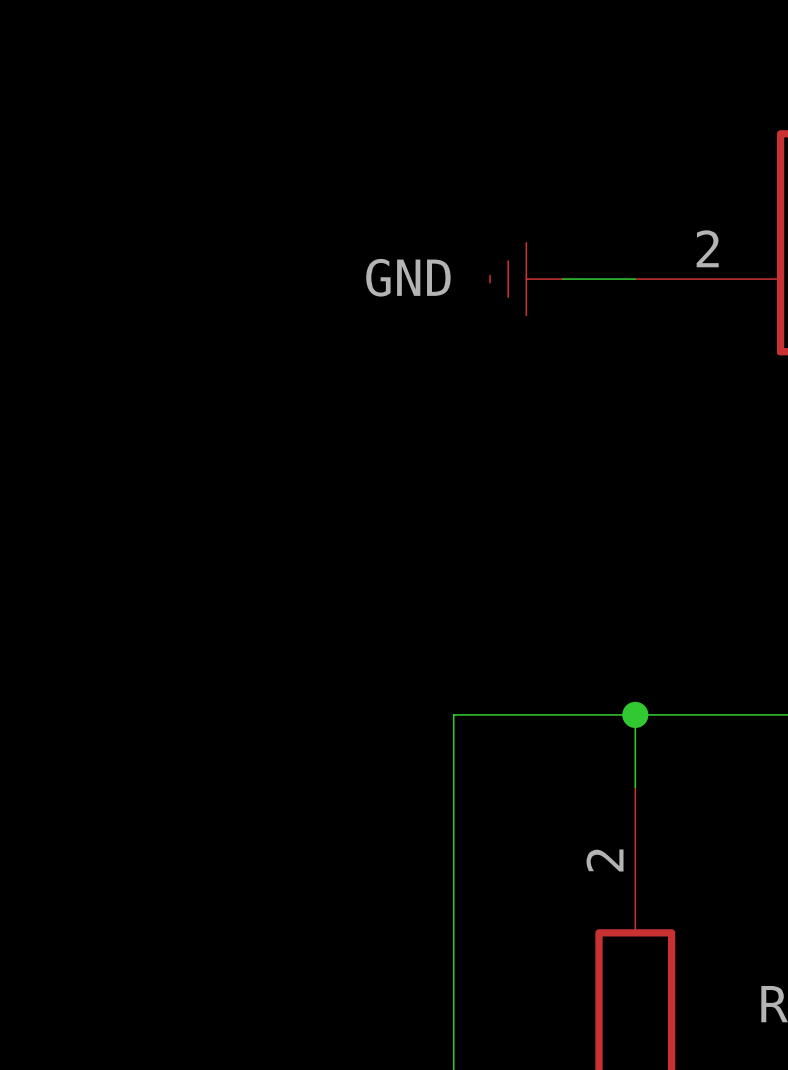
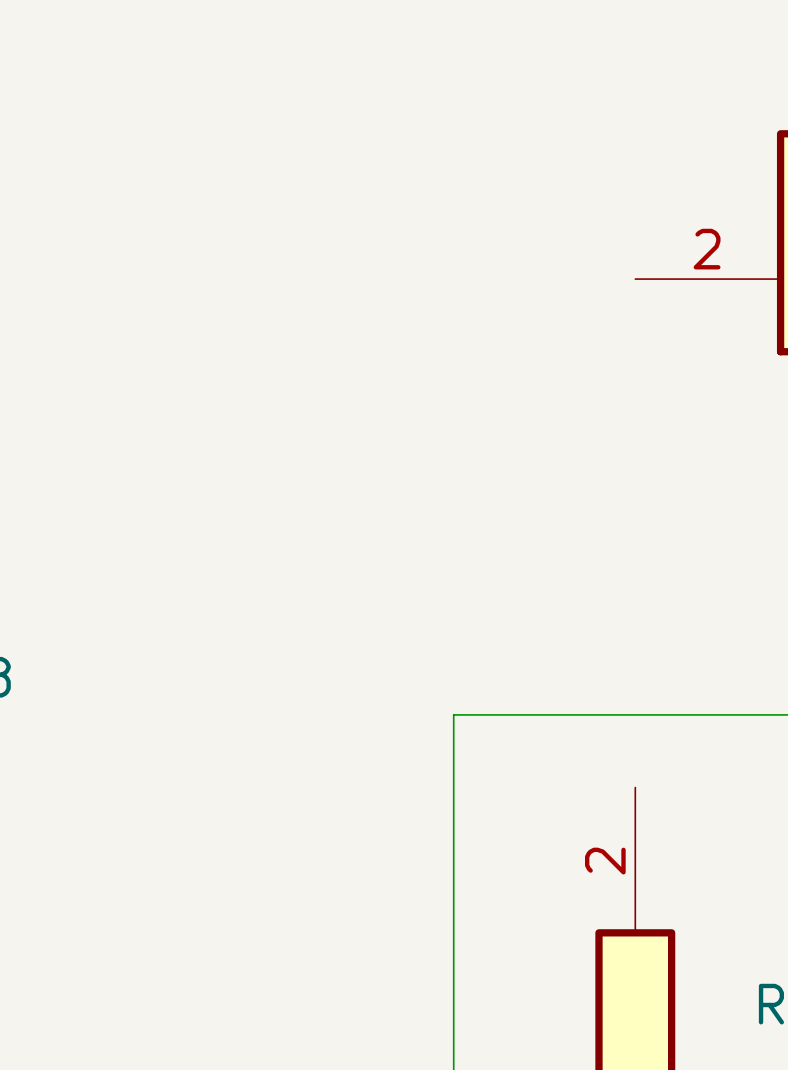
power symbol: GND (526, 279) -> none
wire: (562, 279) (635, 279) -> none
wire: (635, 714) (635, 787) -> none
junction: (635, 714) -> none

